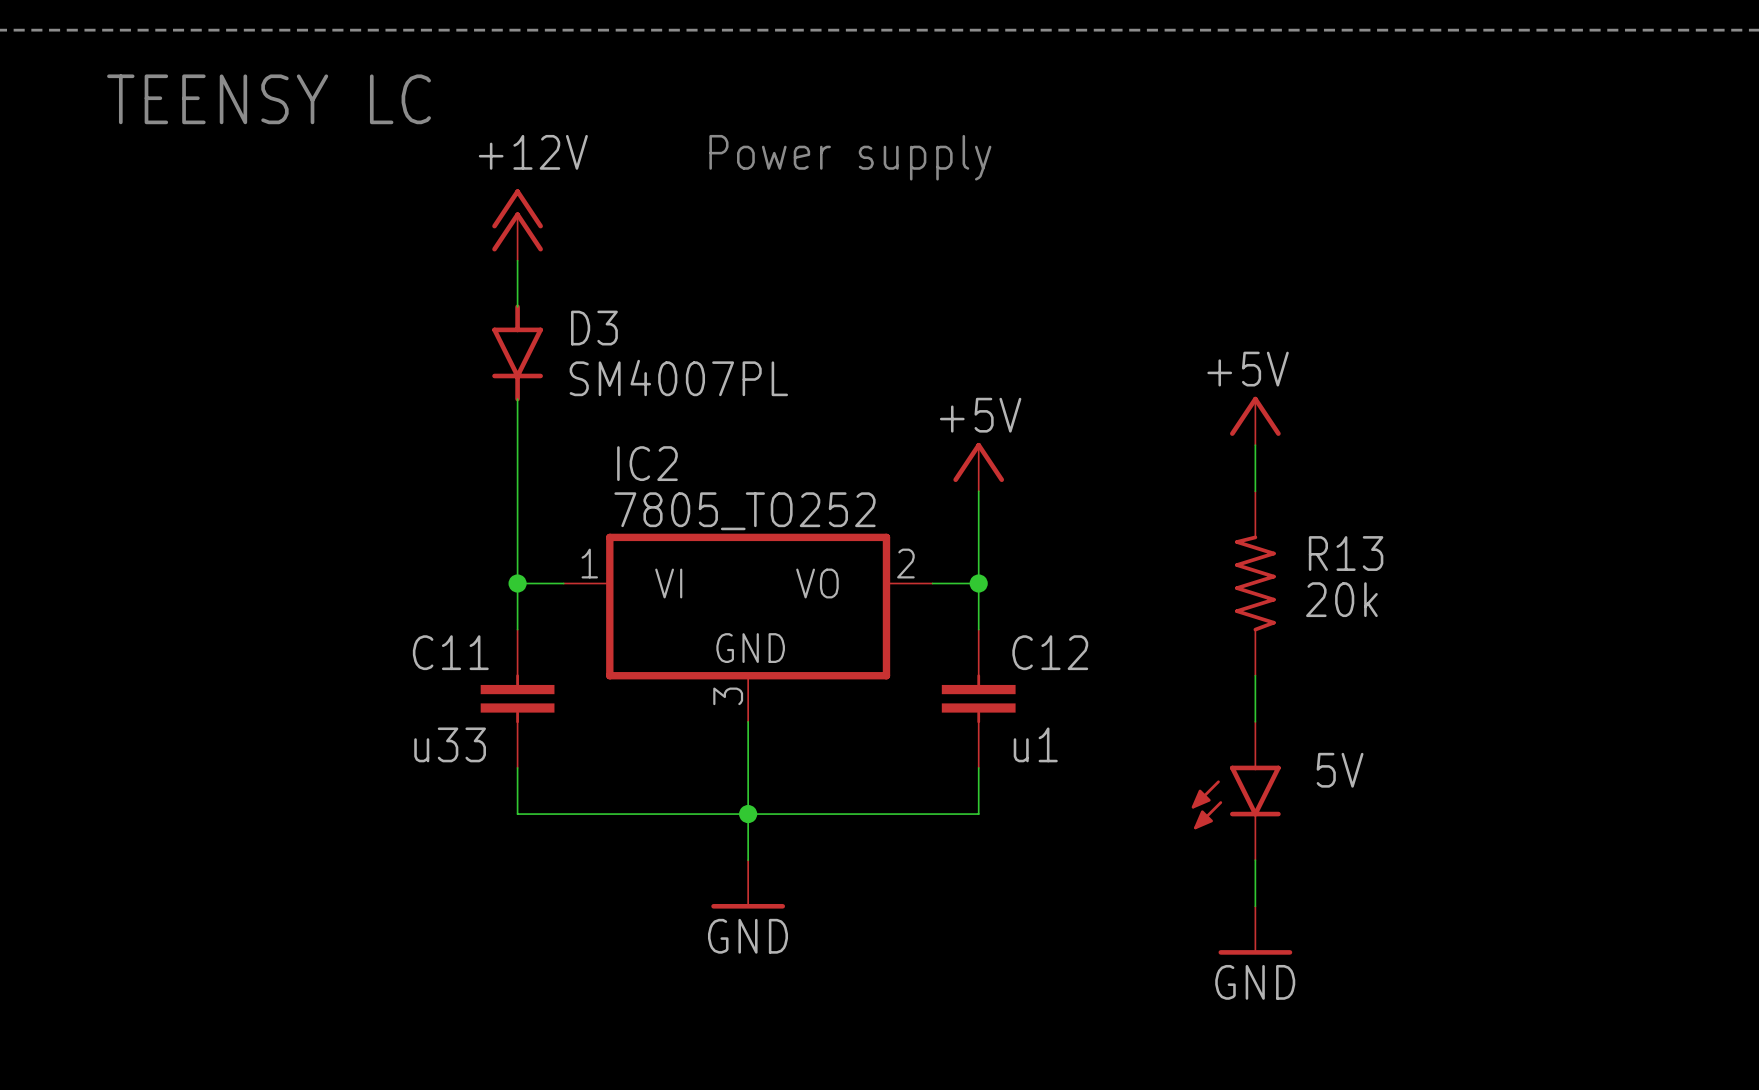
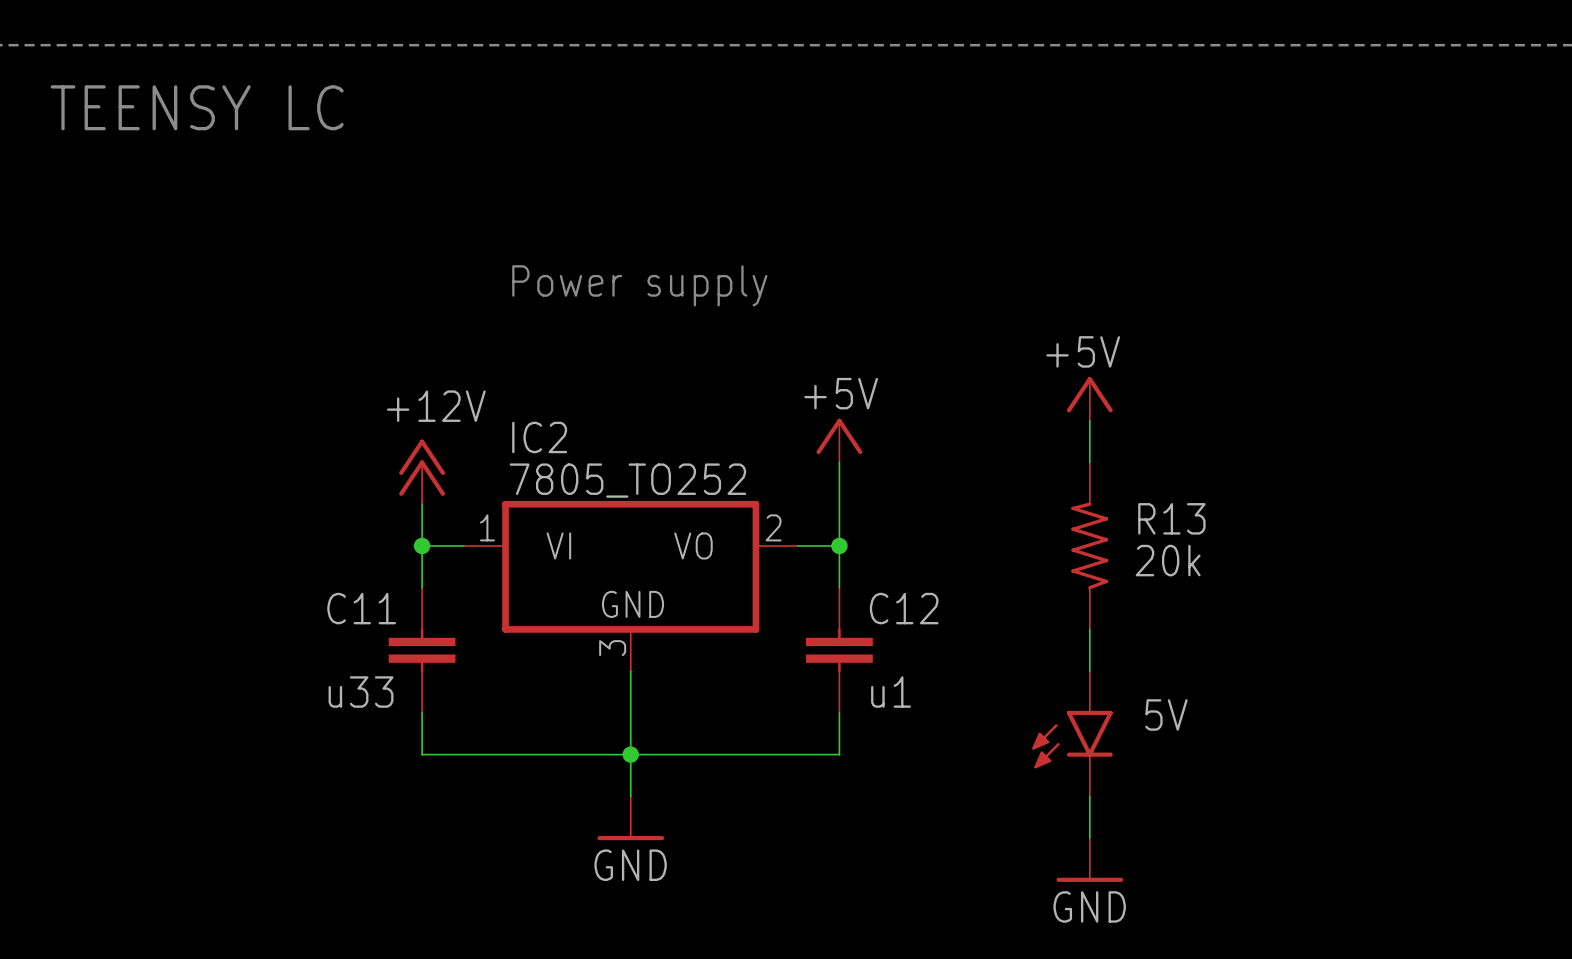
text position: Power supply (850, 157) -> Power supply (639, 285)
power symbol position: +12V (517, 224) -> +12V (422, 471)
wire: (517, 260) (517, 306) -> none
D3: SM4007PL (517, 352) -> none
wire: (517, 399) (517, 537) -> none

